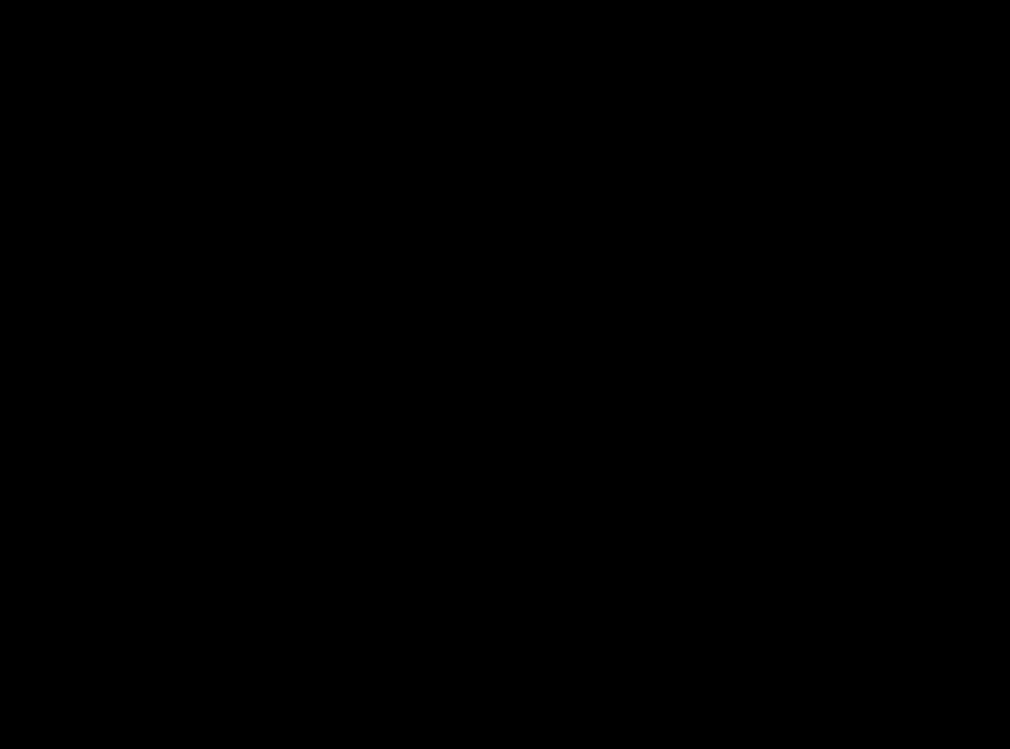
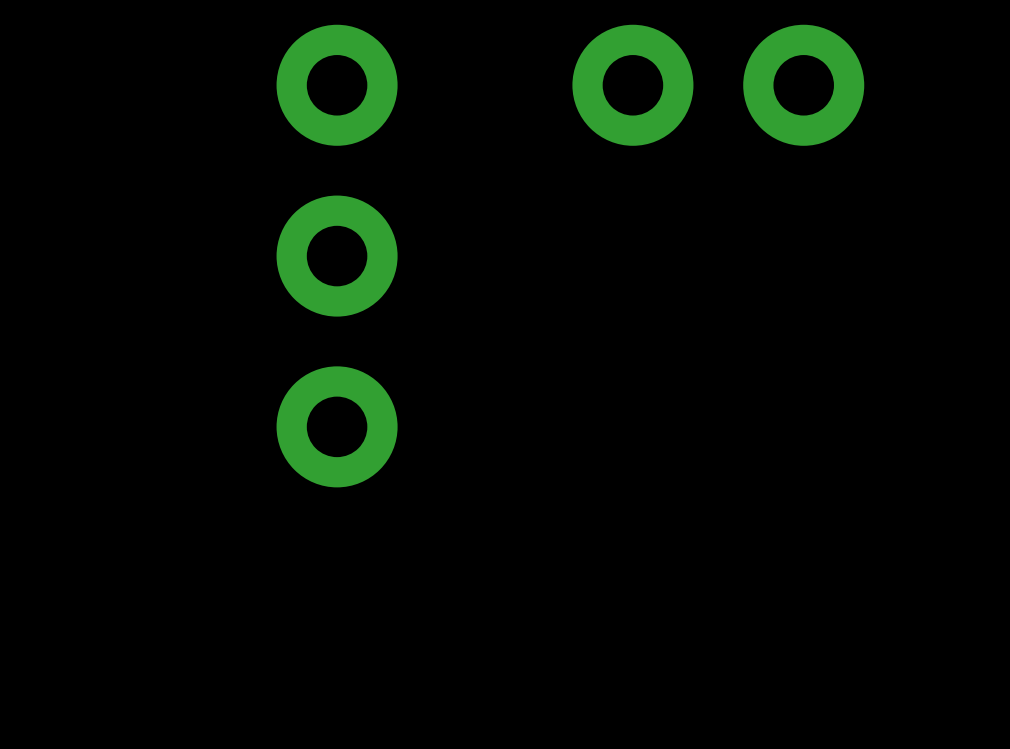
part: none -> (718, 85)
part: none -> (337, 256)

